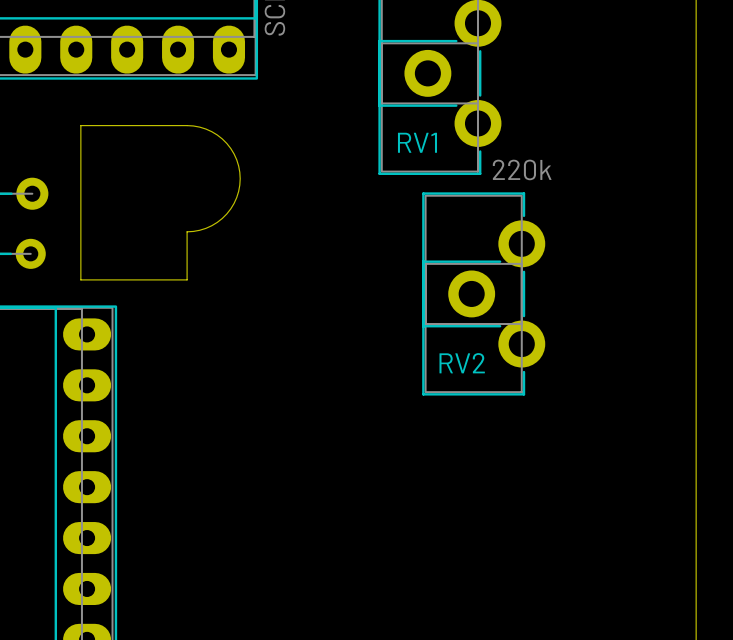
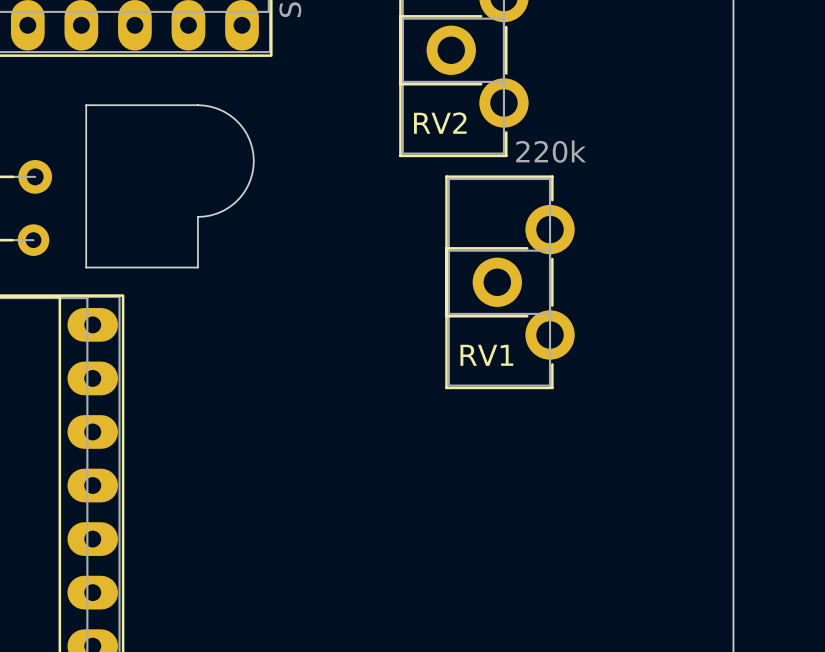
RV1 name: RV1 (417, 142) -> RV2 (440, 123)
RV2 name: RV2 (462, 363) -> RV1 (486, 355)

